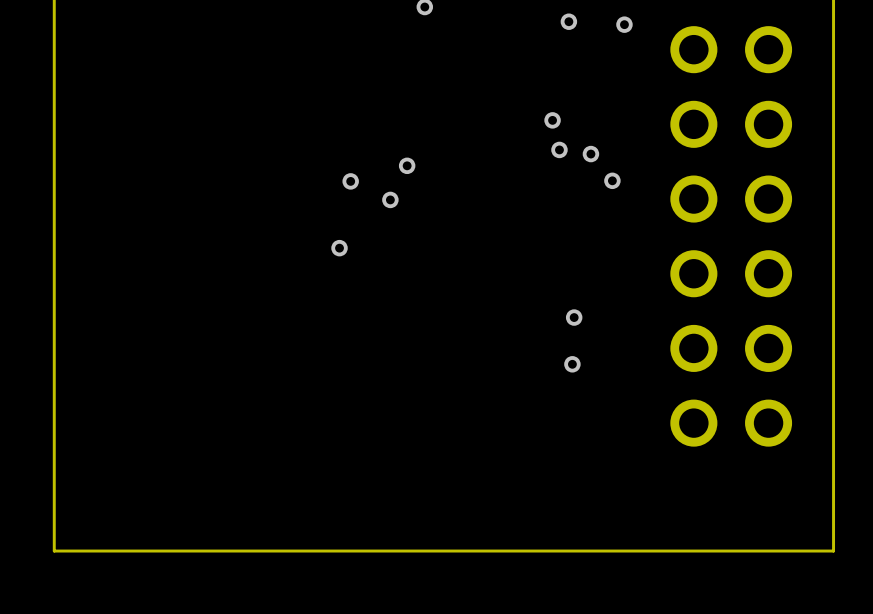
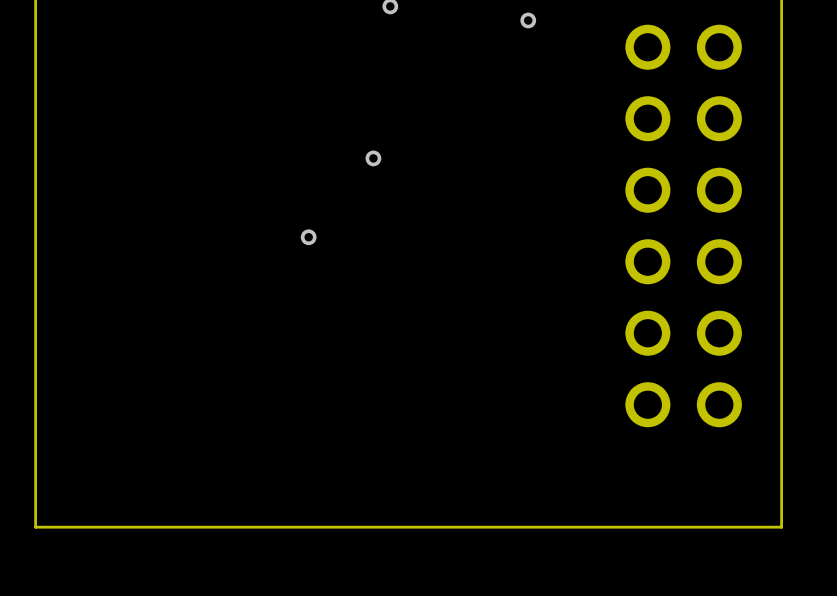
via: (624, 24) -> none
via: (552, 120) -> none
via: (559, 149) -> none
via: (590, 154) -> none
via: (612, 180) -> none
via: (350, 181) -> none
via: (390, 199) -> none
via: (574, 317) -> none
via: (572, 364) -> none

